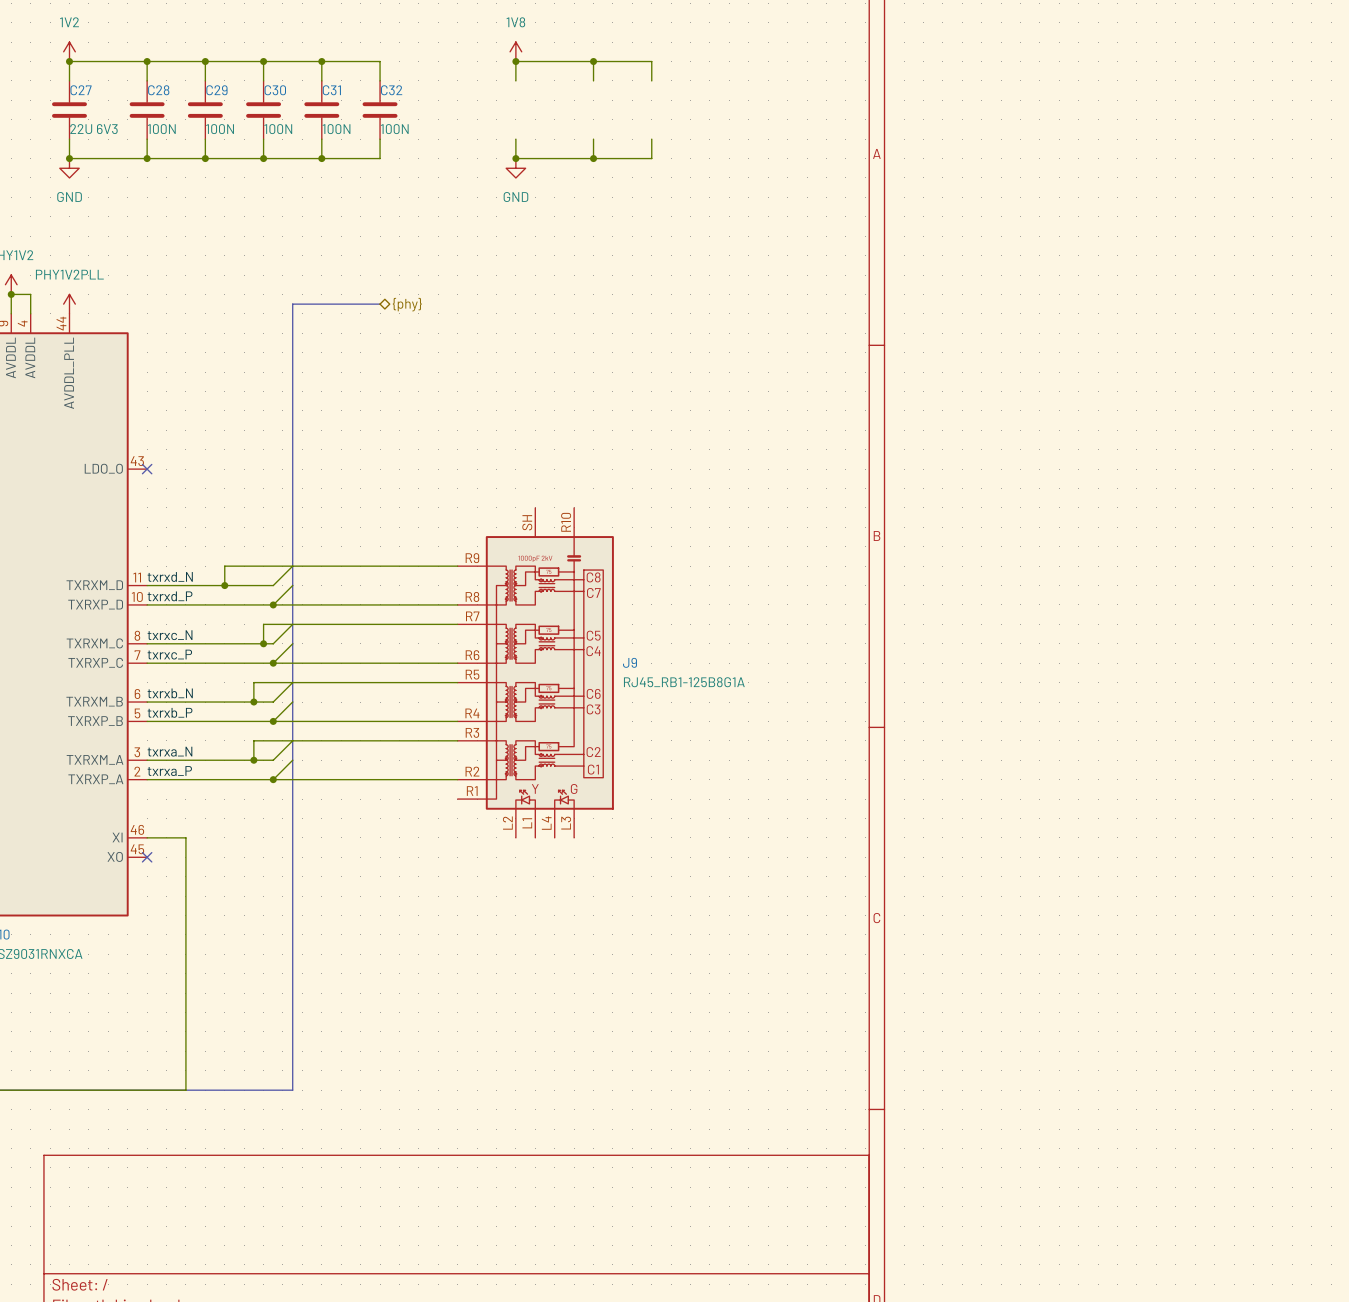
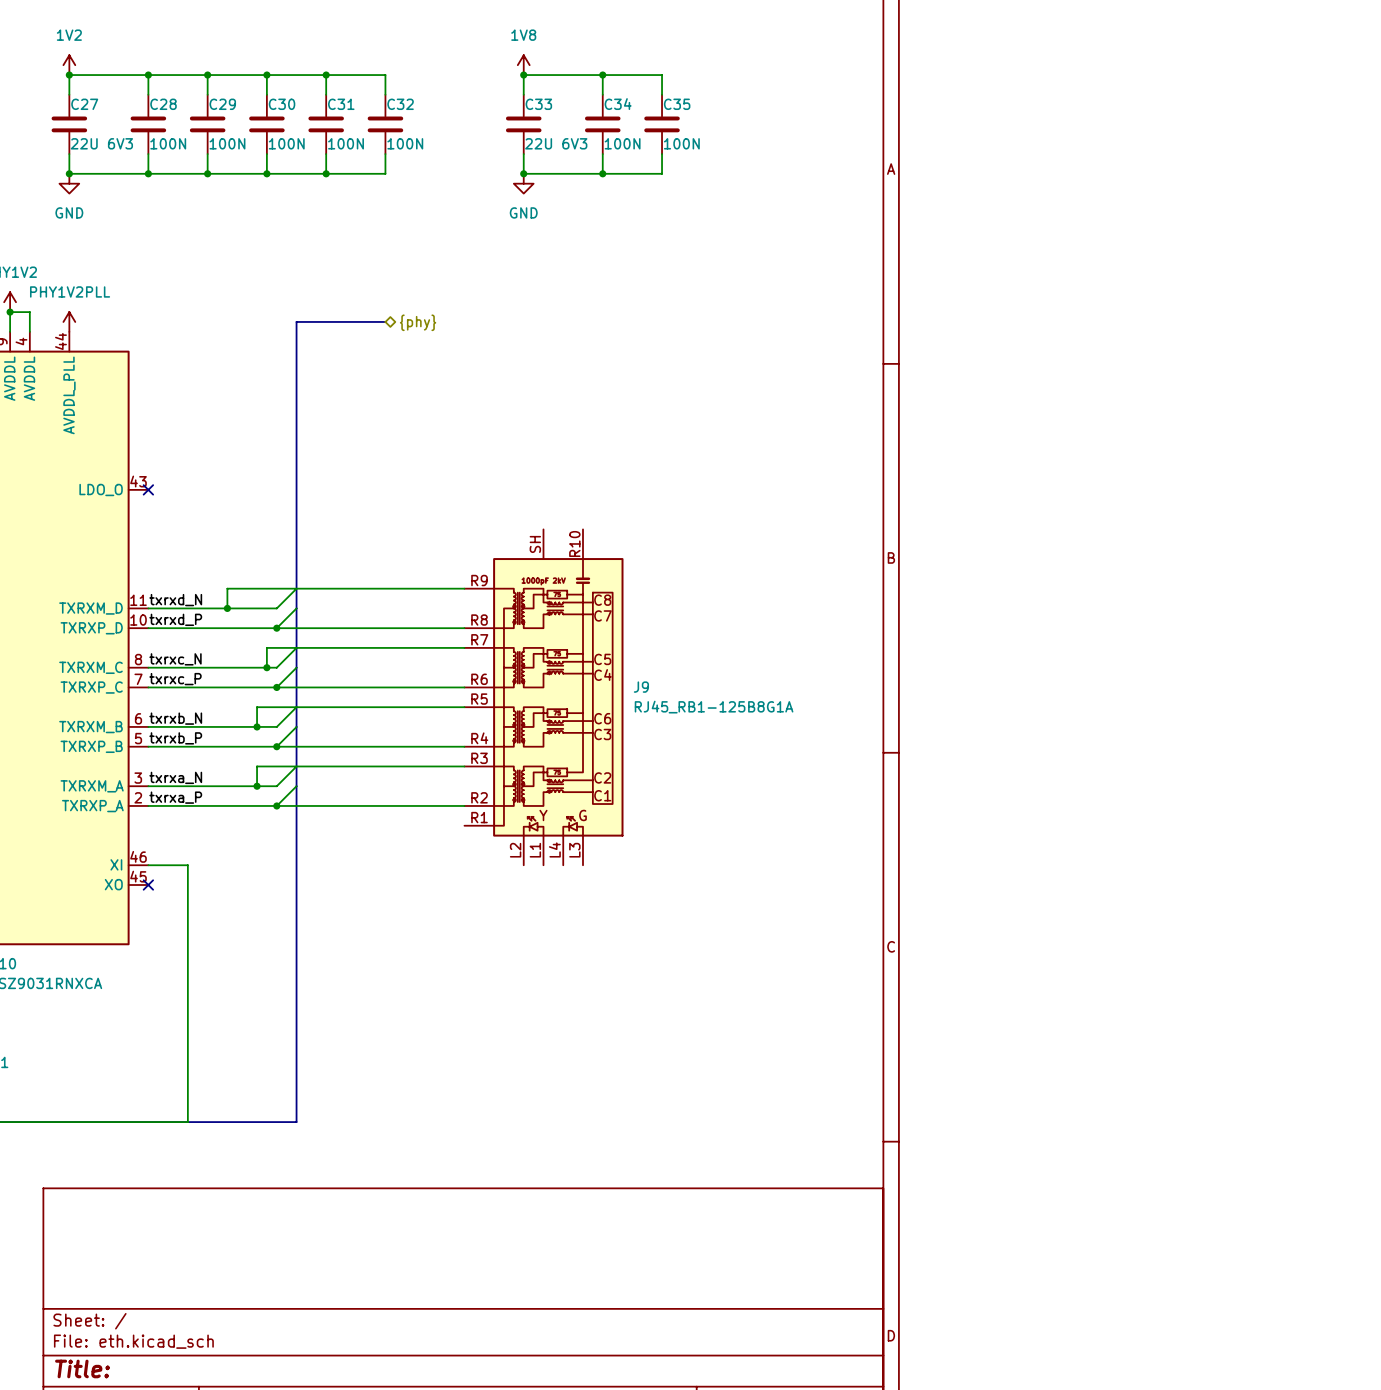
C33: none -> 22U 6V3 (523, 124)
C34: none -> 100N (602, 124)
C35: none -> 100N (662, 124)

